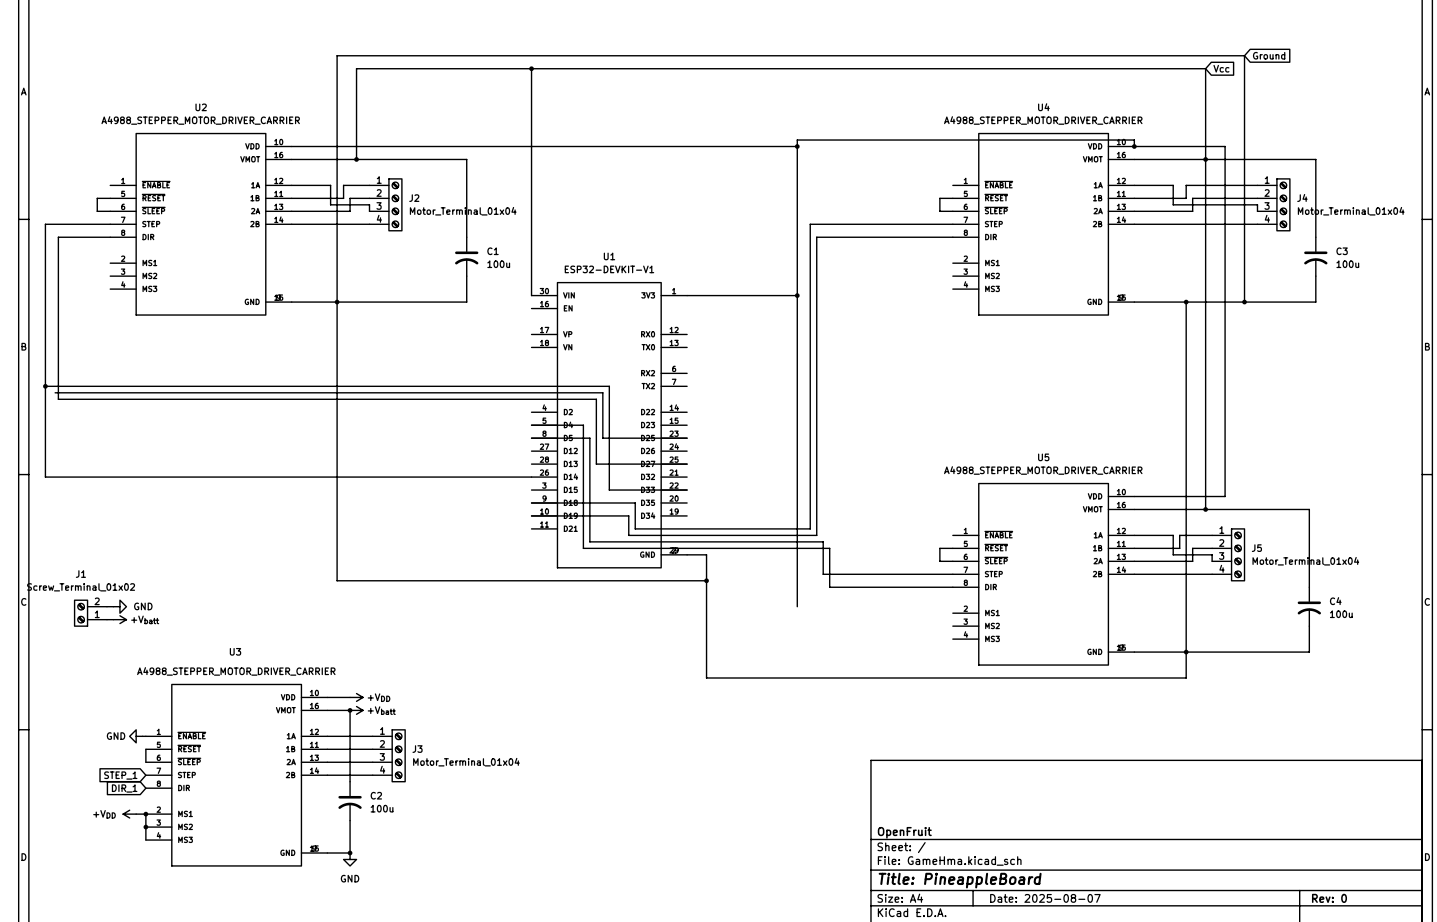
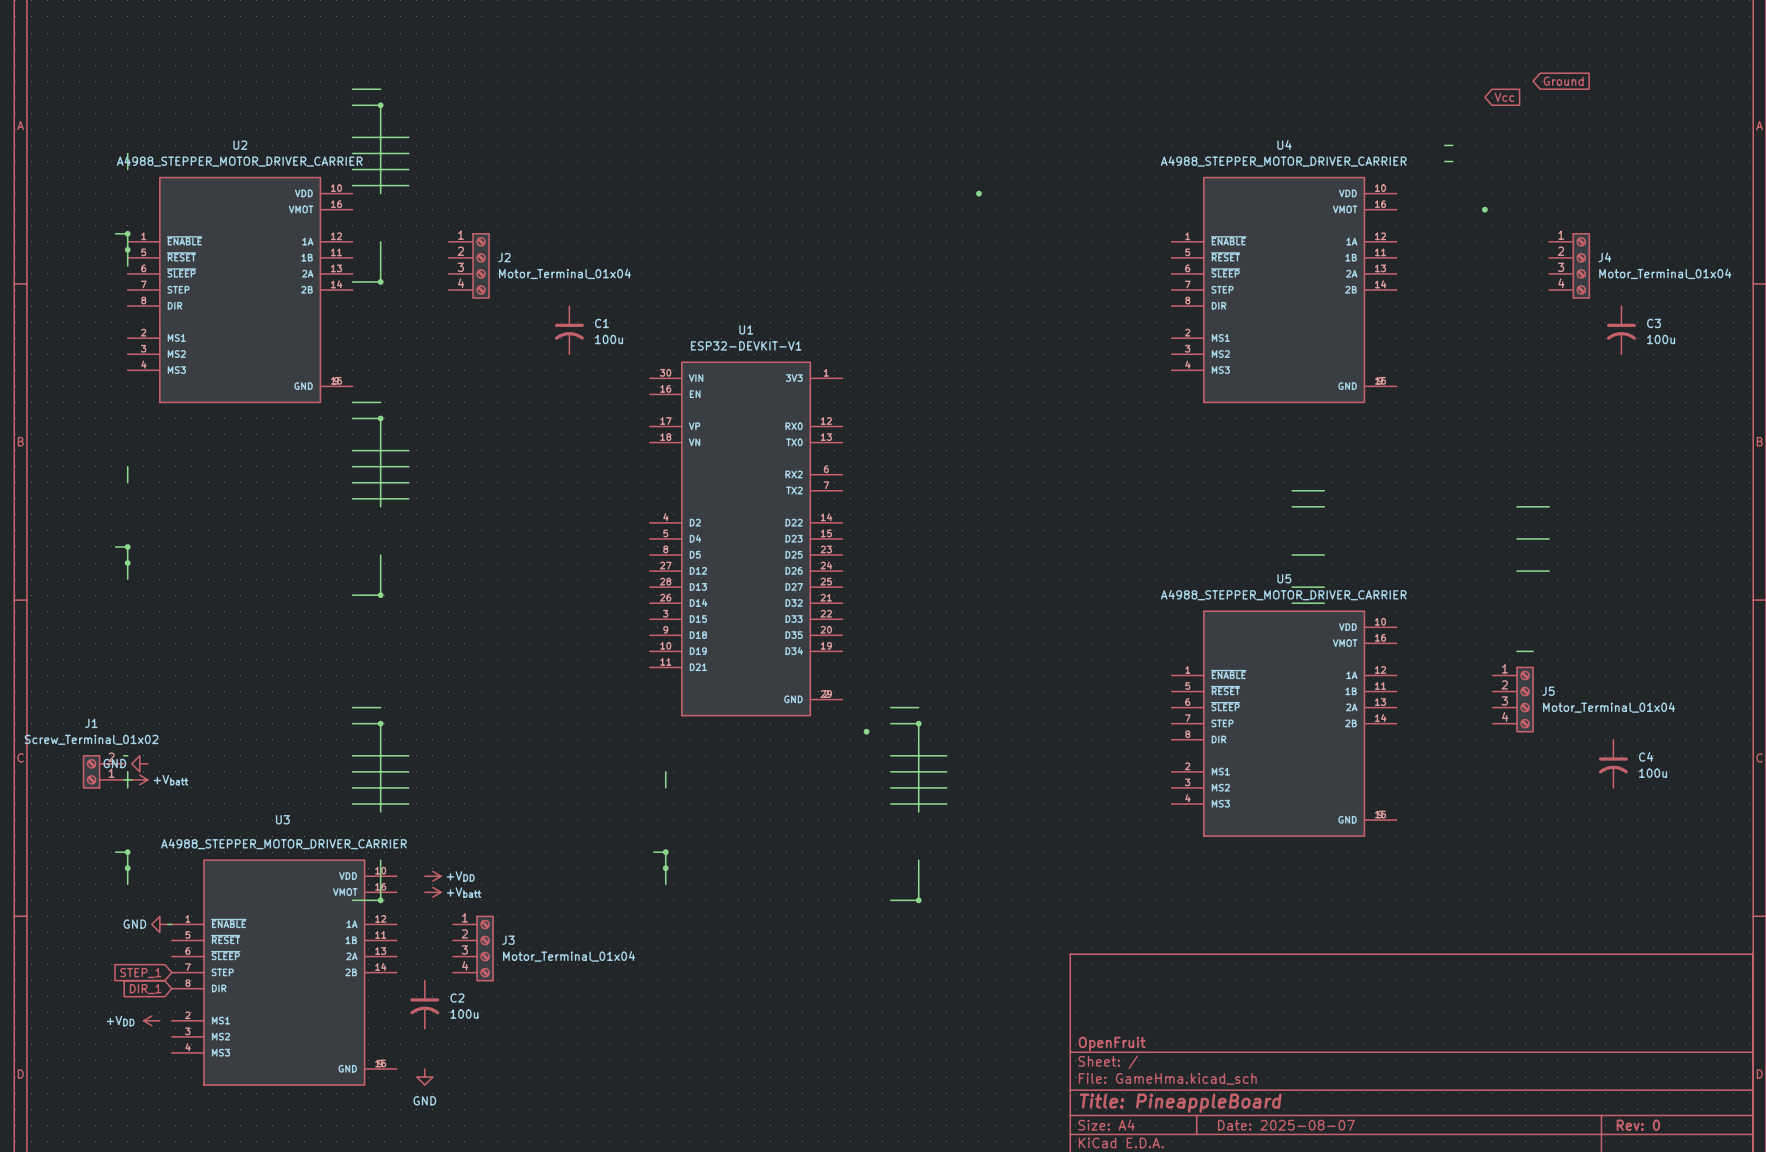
wire: none -> (352, 89) (380, 89)
wire: (531, 68) (531, 295) -> none
junction: (531, 68) -> none
wire: none -> (352, 105) (380, 105) (380, 193)
junction: none -> (380, 105)
wire: none -> (352, 137) (408, 137)
wire: none -> (1444, 145) (1452, 145)
wire: none -> (127, 153) (127, 169)
wire: none -> (352, 153) (408, 153)
wire: none -> (1444, 161) (1452, 161)
wire: none -> (352, 169) (408, 169)
wire: none -> (352, 185) (408, 185)
wire: (291, 146) (797, 146) -> none
junction: (1134, 146) -> none
wire: (291, 159) (466, 159) (466, 237) -> none
wire: (356, 159) (356, 68) (1205, 68) (1205, 509) -> none
junction: (356, 159) -> none
wire: (1134, 159) (1315, 159) (1315, 237) -> none
wire: none -> (115, 233) (127, 233) (127, 265)
junction: none -> (127, 233)
wire: (291, 185) (330, 185) (330, 204) (369, 204) (369, 211) -> none
wire: none -> (380, 241) (380, 281) (352, 281)
wire: (369, 185) (343, 185) (343, 198) (291, 198) -> none
wire: (1134, 185) (1173, 185) (1173, 204) (1257, 204) (1257, 211) -> none
wire: (1257, 185) (1186, 185) (1186, 198) (1134, 198) -> none
junction: none -> (127, 249)
wire: (110, 198) (97, 198) (97, 211) (110, 211) -> none
wire: (369, 198) (350, 198) (350, 211) (291, 211) -> none
wire: (952, 198) (939, 198) (939, 211) (952, 211) -> none
wire: (1257, 198) (1192, 198) (1192, 211) (1134, 211) -> none
junction: none -> (380, 281)
wire: (110, 224) (45, 224) (45, 477) (531, 477) -> none
wire: (291, 224) (369, 224) -> none
wire: (952, 224) (810, 224) (810, 528) (635, 528) (635, 502) (531, 502) -> none
wire: (1134, 224) (1257, 224) -> none
wire: (110, 237) (58, 237) (58, 399) (596, 399) (596, 464) (687, 464) -> none
wire: (952, 237) (816, 237) (816, 535) (628, 535) (628, 515) (531, 515) -> none
wire: (466, 276) (466, 302) (291, 302) -> none
wire: (1315, 276) (1315, 302) (1134, 302) -> none
wire: (687, 295) (797, 295) -> none
junction: (797, 295) -> none
junction: (337, 302) -> none
wire: (1186, 302) (1186, 677) (706, 677) (706, 554) (687, 554) -> none
junction: (1186, 302) -> none
wire: (1244, 302) (1244, 55) (337, 55) (337, 580) (706, 580) -> none
junction: (1244, 302) -> none
wire: none -> (352, 402) (380, 402)
wire: none -> (352, 418) (380, 418) (380, 506)
junction: none -> (380, 418)
wire: none -> (352, 450) (408, 450)
wire: none -> (127, 466) (127, 482)
wire: none -> (352, 466) (408, 466)
wire: none -> (352, 482) (408, 482)
wire: (45, 386) (609, 386) (609, 490) (687, 490) -> none
junction: (45, 386) -> none
wire: none -> (1292, 490) (1324, 490)
wire: (55, 392) (291, 392) -> none
wire: (337, 392) (602, 392) (602, 438) (687, 438) -> none
wire: none -> (1292, 506) (1324, 506)
wire: none -> (1517, 506) (1549, 506)
wire: (531, 425) (583, 425) (583, 548) (829, 548) (829, 587) (952, 587) -> none
wire: none -> (1517, 538) (1549, 538)
wire: none -> (115, 546) (127, 546) (127, 579)
junction: none -> (127, 546)
wire: none -> (380, 555) (380, 595) (352, 595)
wire: (531, 438) (589, 438) (589, 541) (823, 541) (823, 574) (952, 574) -> none
wire: none -> (1292, 555) (1324, 555)
junction: none -> (127, 563)
wire: none -> (1517, 571) (1549, 571)
wire: none -> (1292, 587) (1324, 587)
junction: none -> (380, 595)
wire: none -> (1292, 603) (1324, 603)
wire: (1134, 496) (1225, 496) (1225, 146) (1134, 146) (1134, 140) (797, 140) (797, 606) -> none
wire: (1134, 509) (1309, 509) (1309, 587) -> none
junction: (1205, 509) -> none
wire: none -> (1517, 651) (1533, 651)
wire: (1134, 535) (1173, 535) (1173, 554) (1212, 554) (1212, 561) -> none
wire: (1212, 535) (1179, 535) (1179, 548) (1134, 548) -> none
wire: (952, 548) (939, 548) (939, 561) (952, 561) -> none
wire: (1212, 548) (1192, 548) (1192, 561) (1134, 561) -> none
wire: none -> (352, 707) (380, 707)
wire: none -> (890, 707) (918, 707)
wire: none -> (352, 723) (380, 723) (380, 812)
junction: none -> (380, 723)
wire: none -> (890, 723) (918, 723) (918, 812)
junction: none -> (918, 723)
wire: (1134, 574) (1212, 574) -> none
wire: none -> (123, 755) (127, 755)
wire: none -> (352, 755) (408, 755)
wire: none -> (890, 755) (946, 755)
wire: (106, 606) (113, 606) -> none
power symbol rotation: 0° (119, 606) -> 180° (139, 763)
wire: none -> (127, 771) (127, 787)
wire: none -> (352, 771) (408, 771)
wire: none -> (665, 771) (665, 787)
wire: none -> (890, 771) (946, 771)
wire: none -> (890, 787) (946, 787)
wire: (1309, 626) (1309, 652) (1134, 652) -> none
wire: none -> (890, 803) (946, 803)
junction: (1186, 652) -> none
wire: none -> (115, 852) (127, 852) (127, 884)
junction: none -> (127, 852)
wire: none -> (653, 852) (665, 852) (665, 884)
junction: none -> (665, 852)
wire: none -> (380, 860) (380, 900) (352, 900)
wire: none -> (918, 860) (918, 900) (890, 900)
junction: none -> (127, 868)
junction: none -> (665, 868)
wire: (327, 697) (350, 697) -> none
wire: (327, 710) (350, 710) (350, 781) -> none
junction: (350, 710) -> none
junction: none -> (380, 900)
junction: none -> (918, 900)
wire: (327, 736) (372, 736) -> (352, 787) (408, 787)
wire: (145, 749) (145, 762) -> none
wire: (327, 749) (372, 749) -> (352, 803) (408, 803)
wire: (327, 762) (372, 762) -> none
wire: (327, 775) (372, 775) -> none
wire: (136, 814) (145, 814) (145, 840) -> none
junction: (145, 814) -> none
wire: (350, 820) (350, 853) (327, 853) -> none
junction: (145, 827) -> none
junction: (350, 853) -> none

